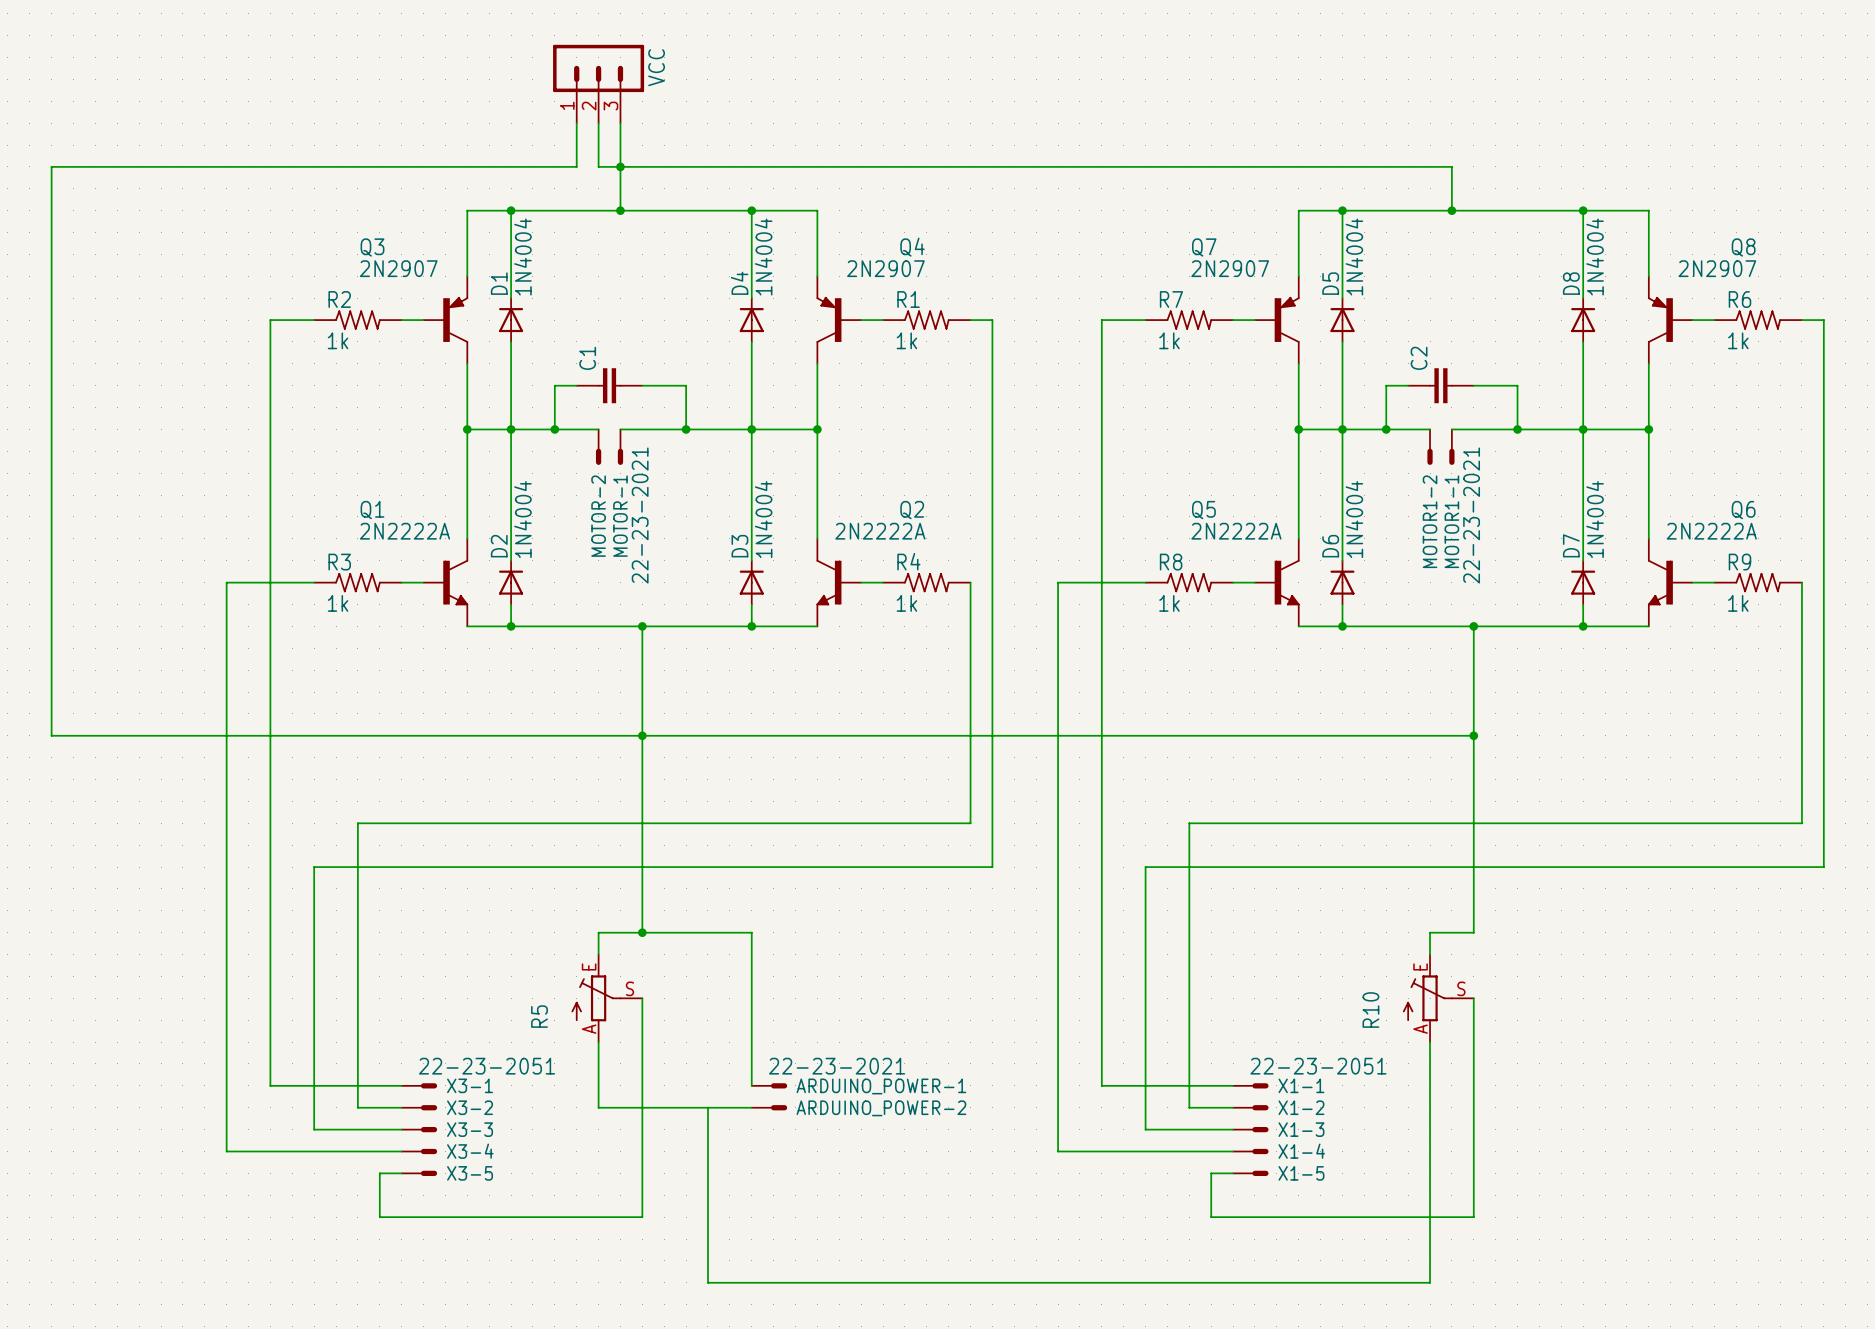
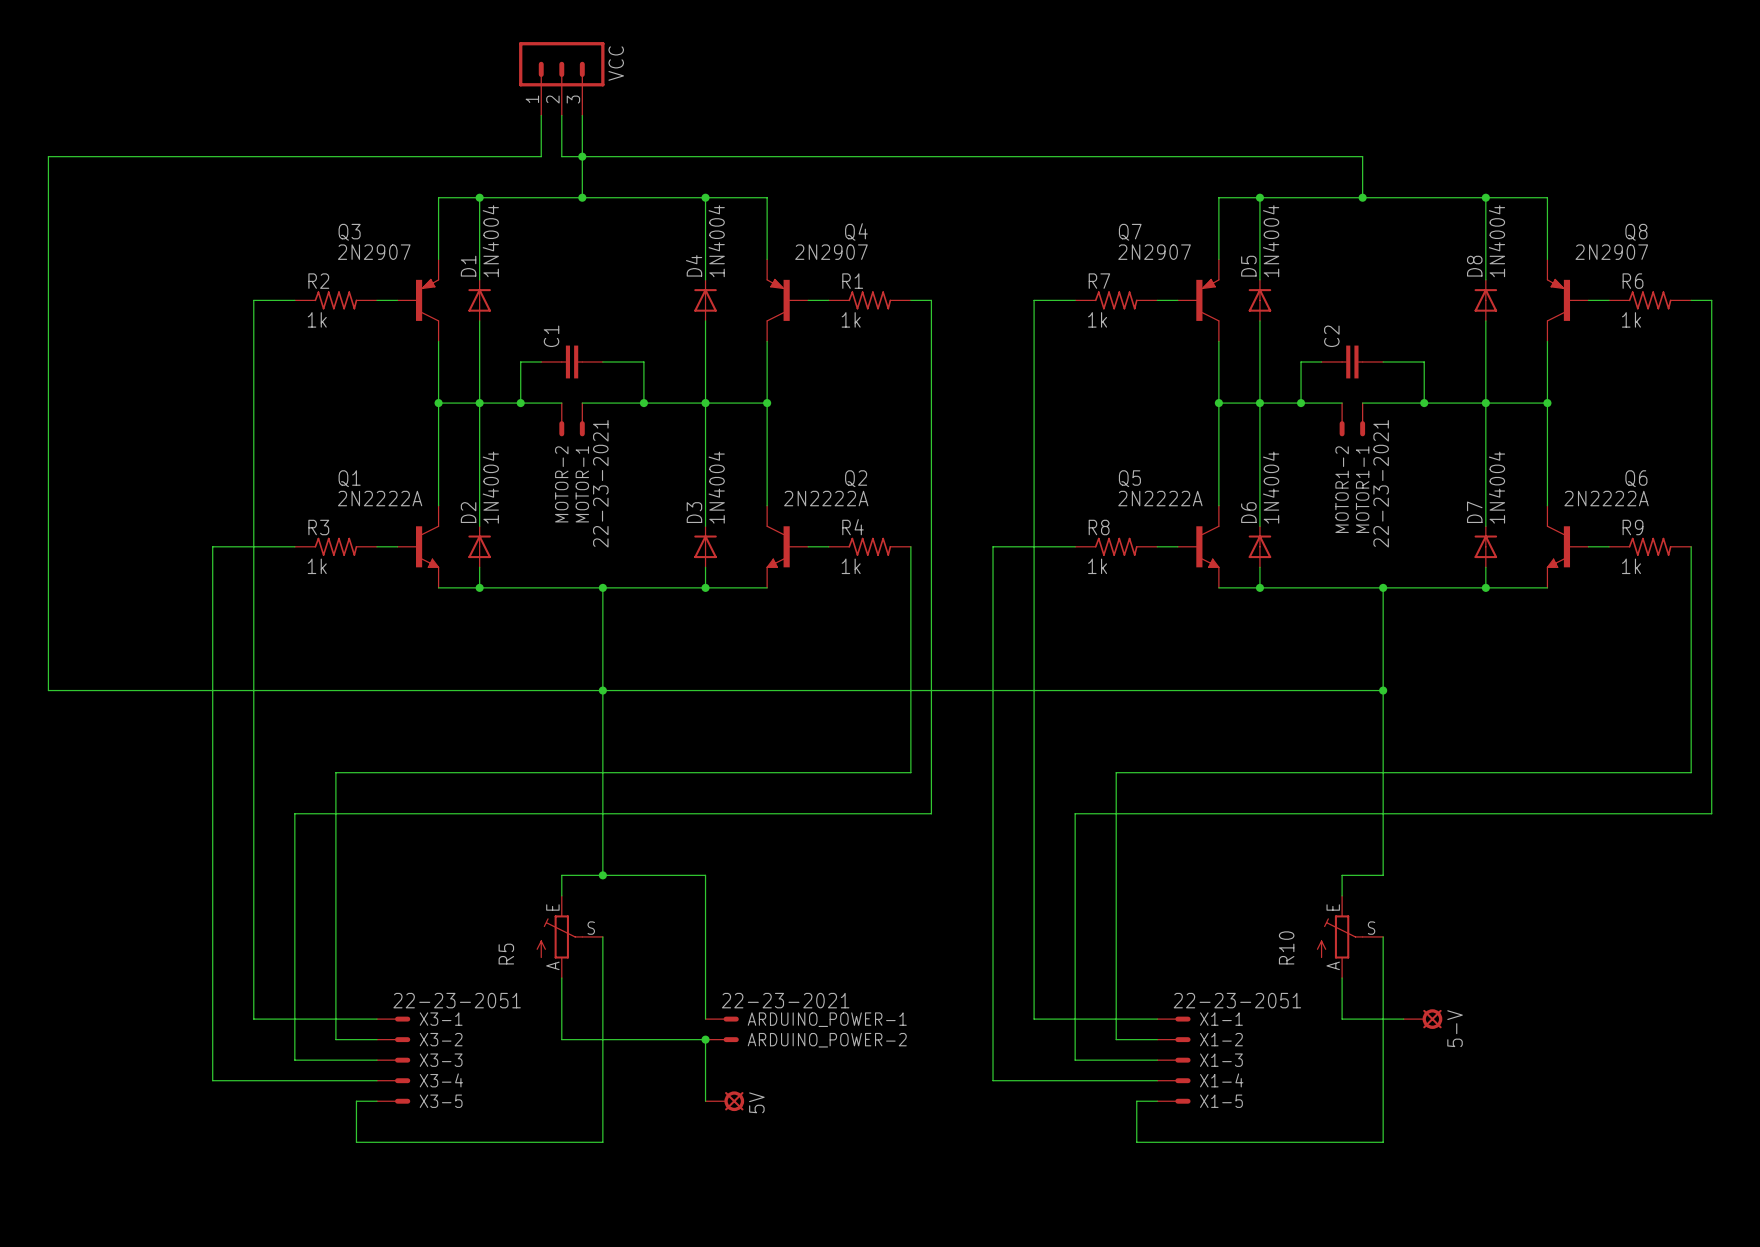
wire: (1430, 1085) (1430, 1282) (707, 1282) (707, 1107) -> (1342, 1019) (1403, 1019)
5-V: none -> (1423, 1019)
wire: none -> (705, 1039) (705, 1101)
junction: none -> (705, 1039)
5V: none -> (724, 1101)

